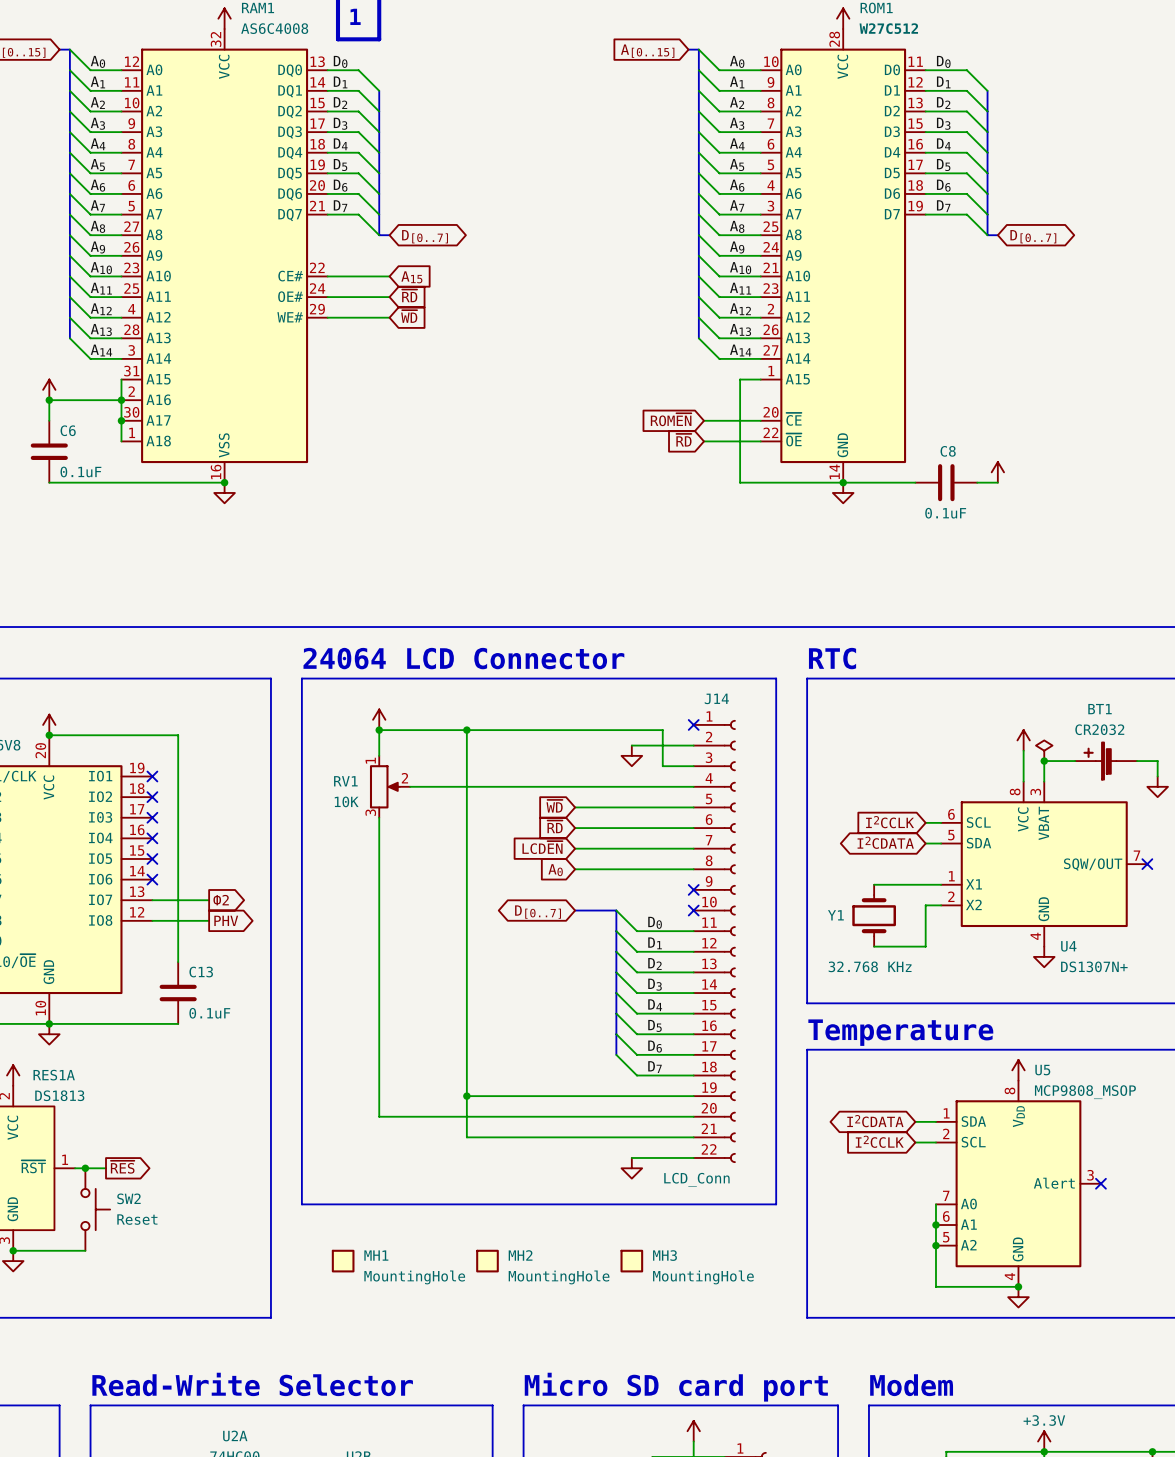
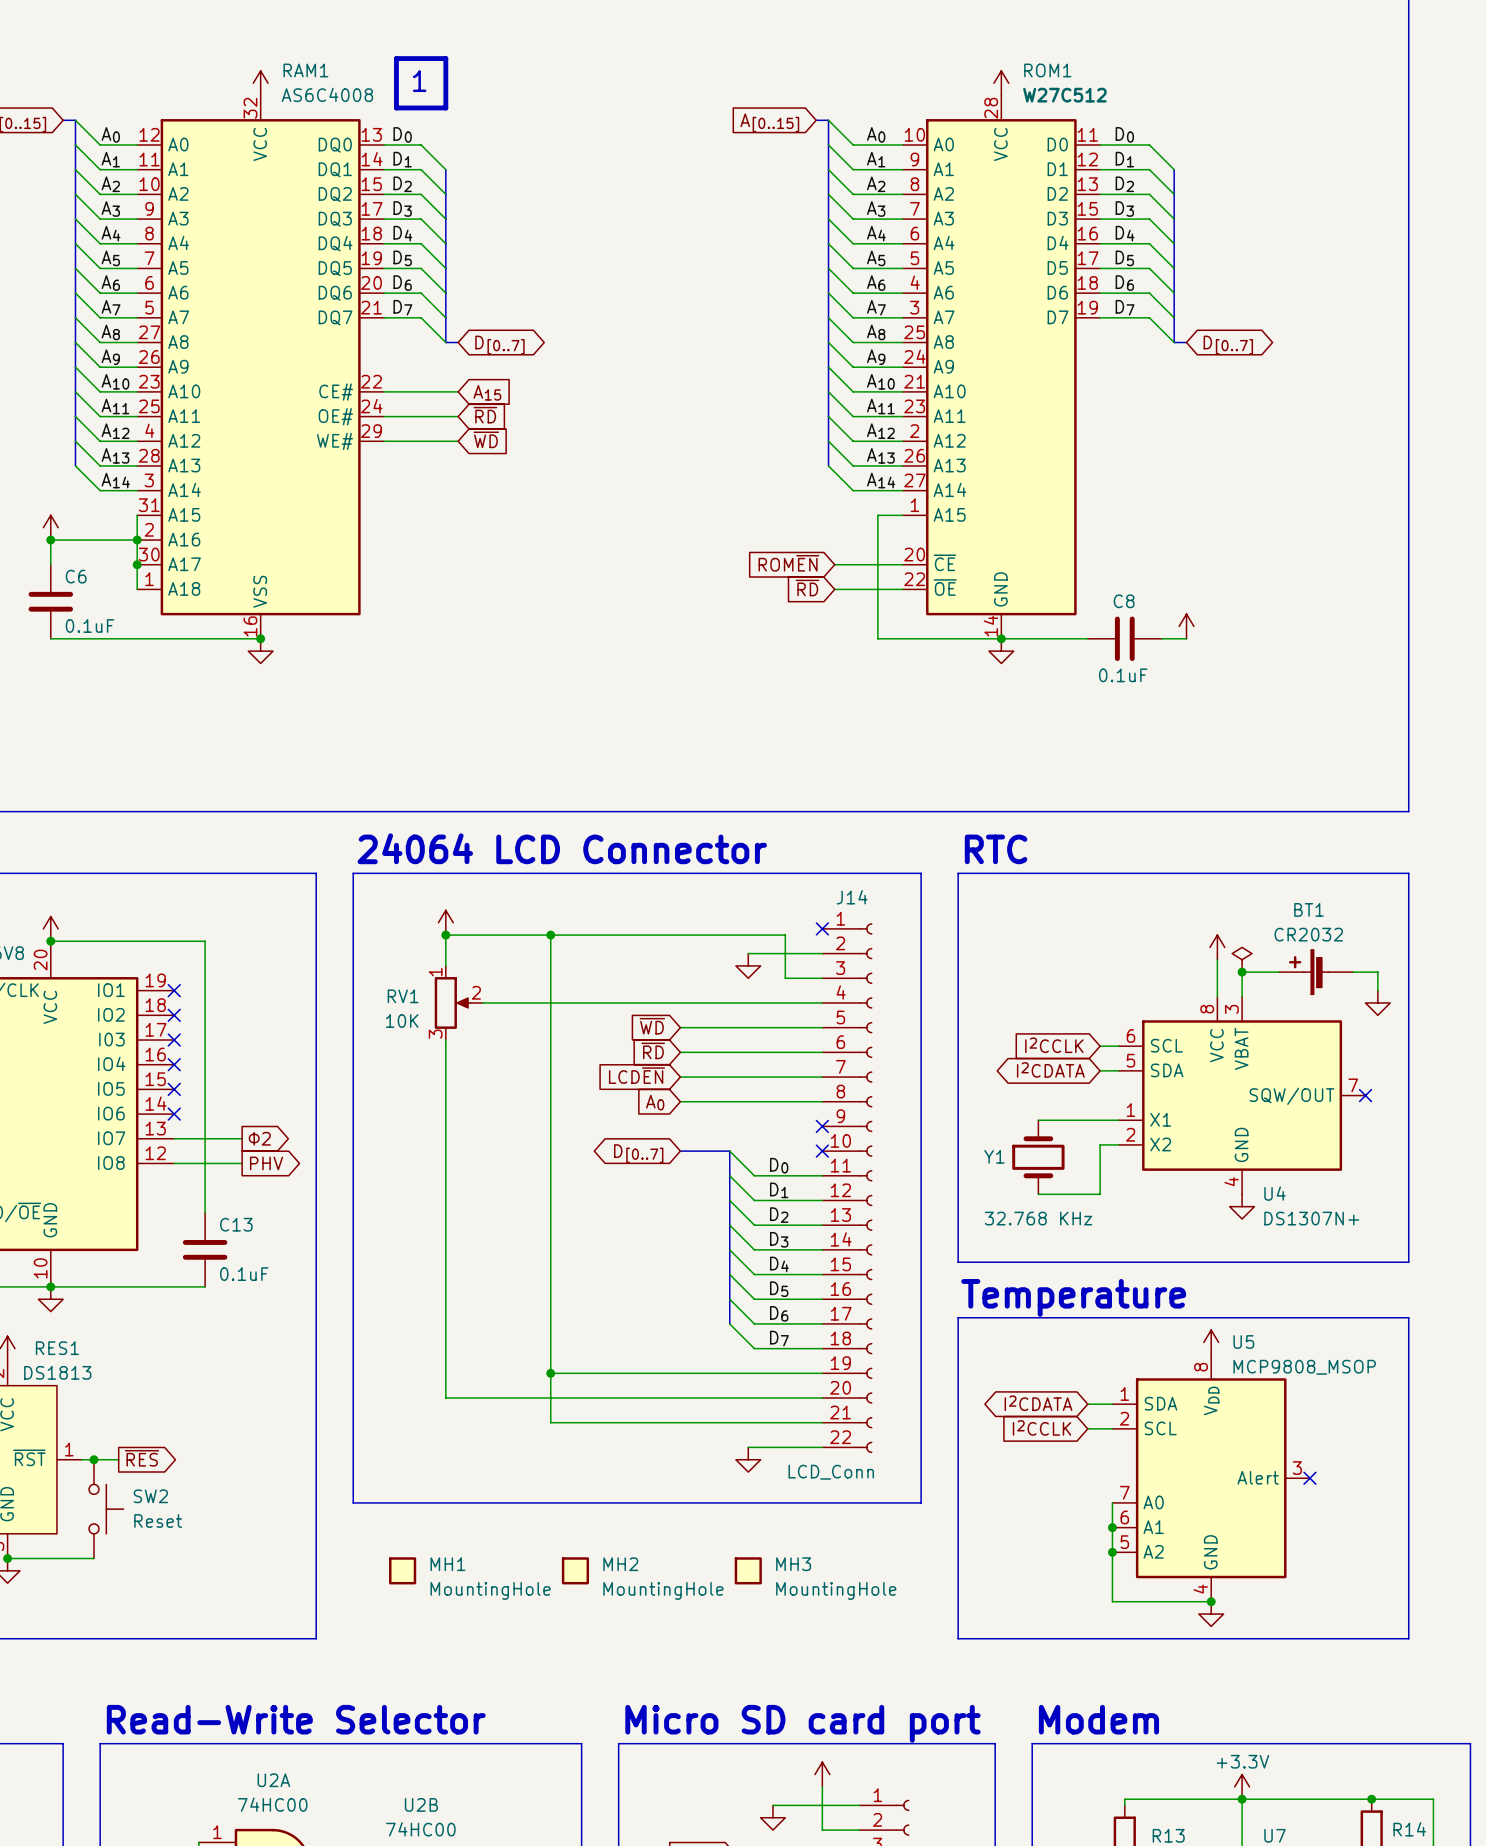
RES1A name: RES1A (54, 1075) -> RES1 (57, 1348)

